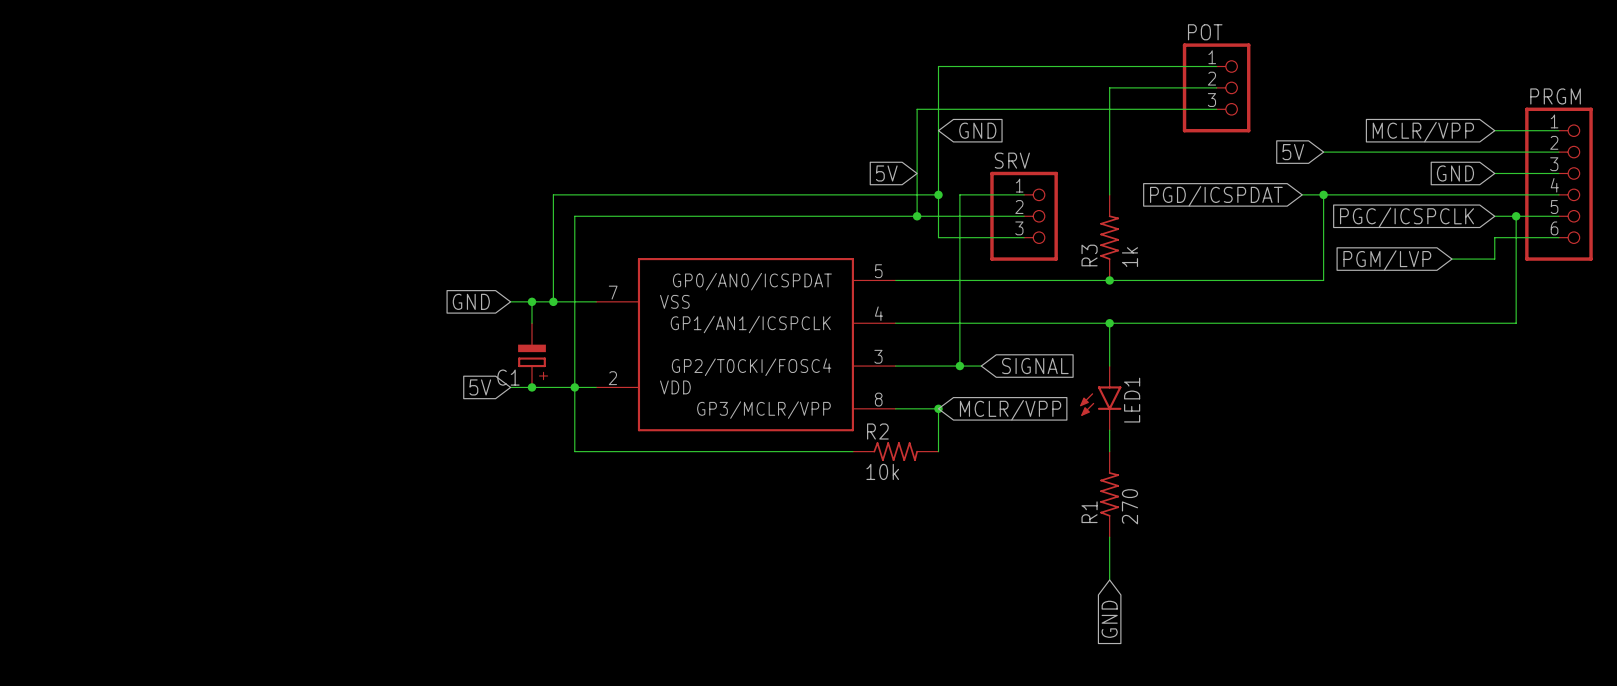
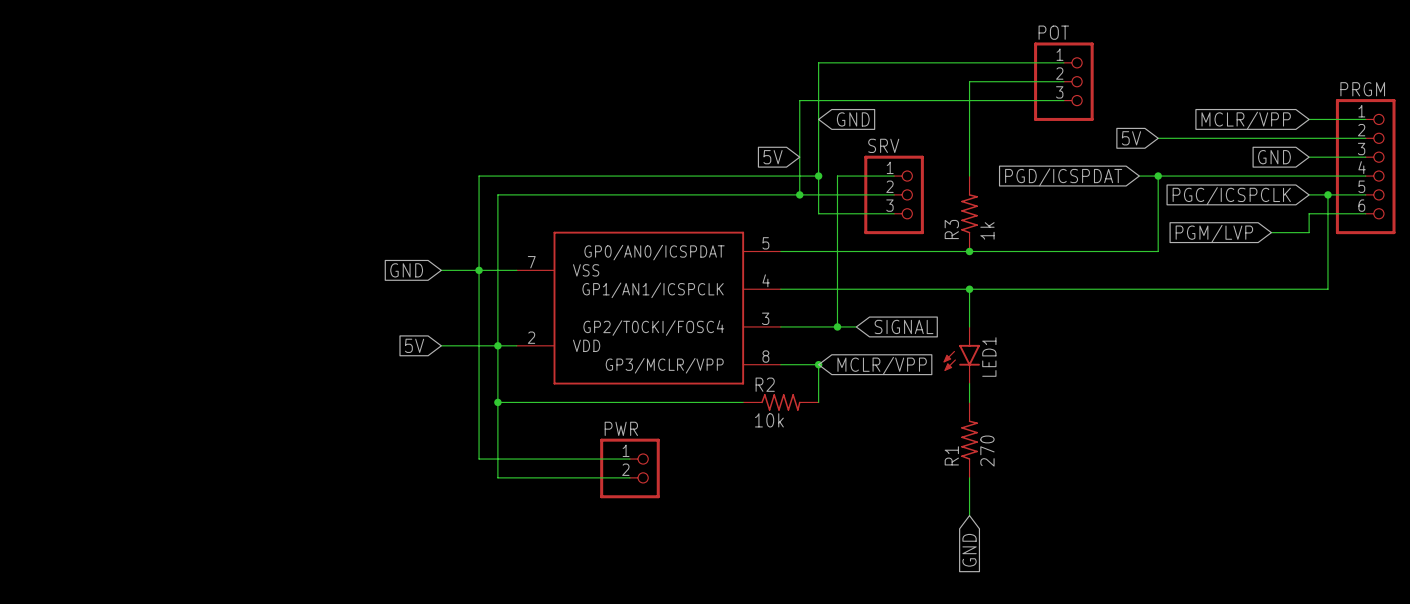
wire: (532, 301) (532, 323) -> none
junction: (532, 301) -> none
wire: none -> (479, 270) (479, 459) (629, 459)
C1: (532, 355) -> none
junction: (532, 387) -> none
wire: none -> (497, 402) (497, 477) (629, 477)
junction: none -> (497, 402)
PWR: none -> (629, 468)

